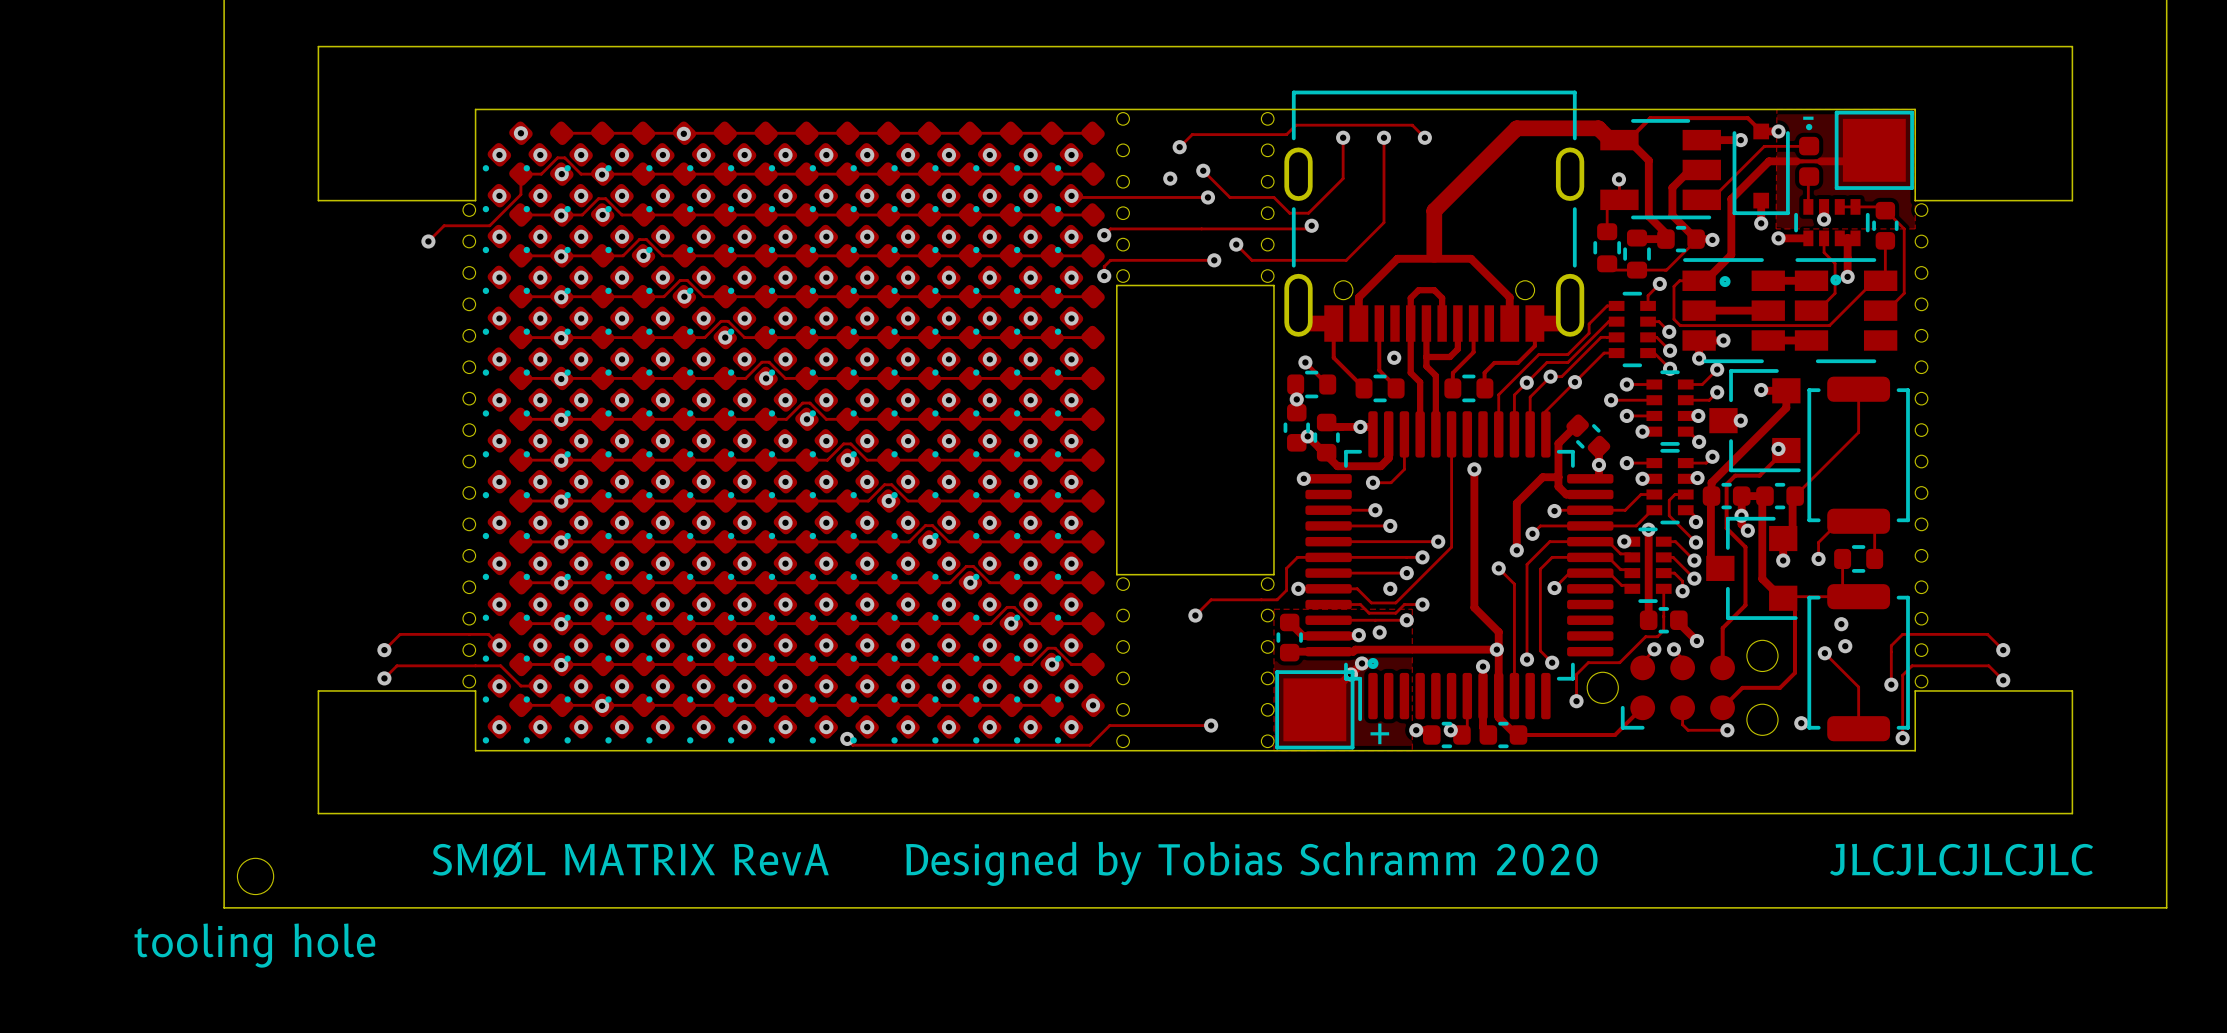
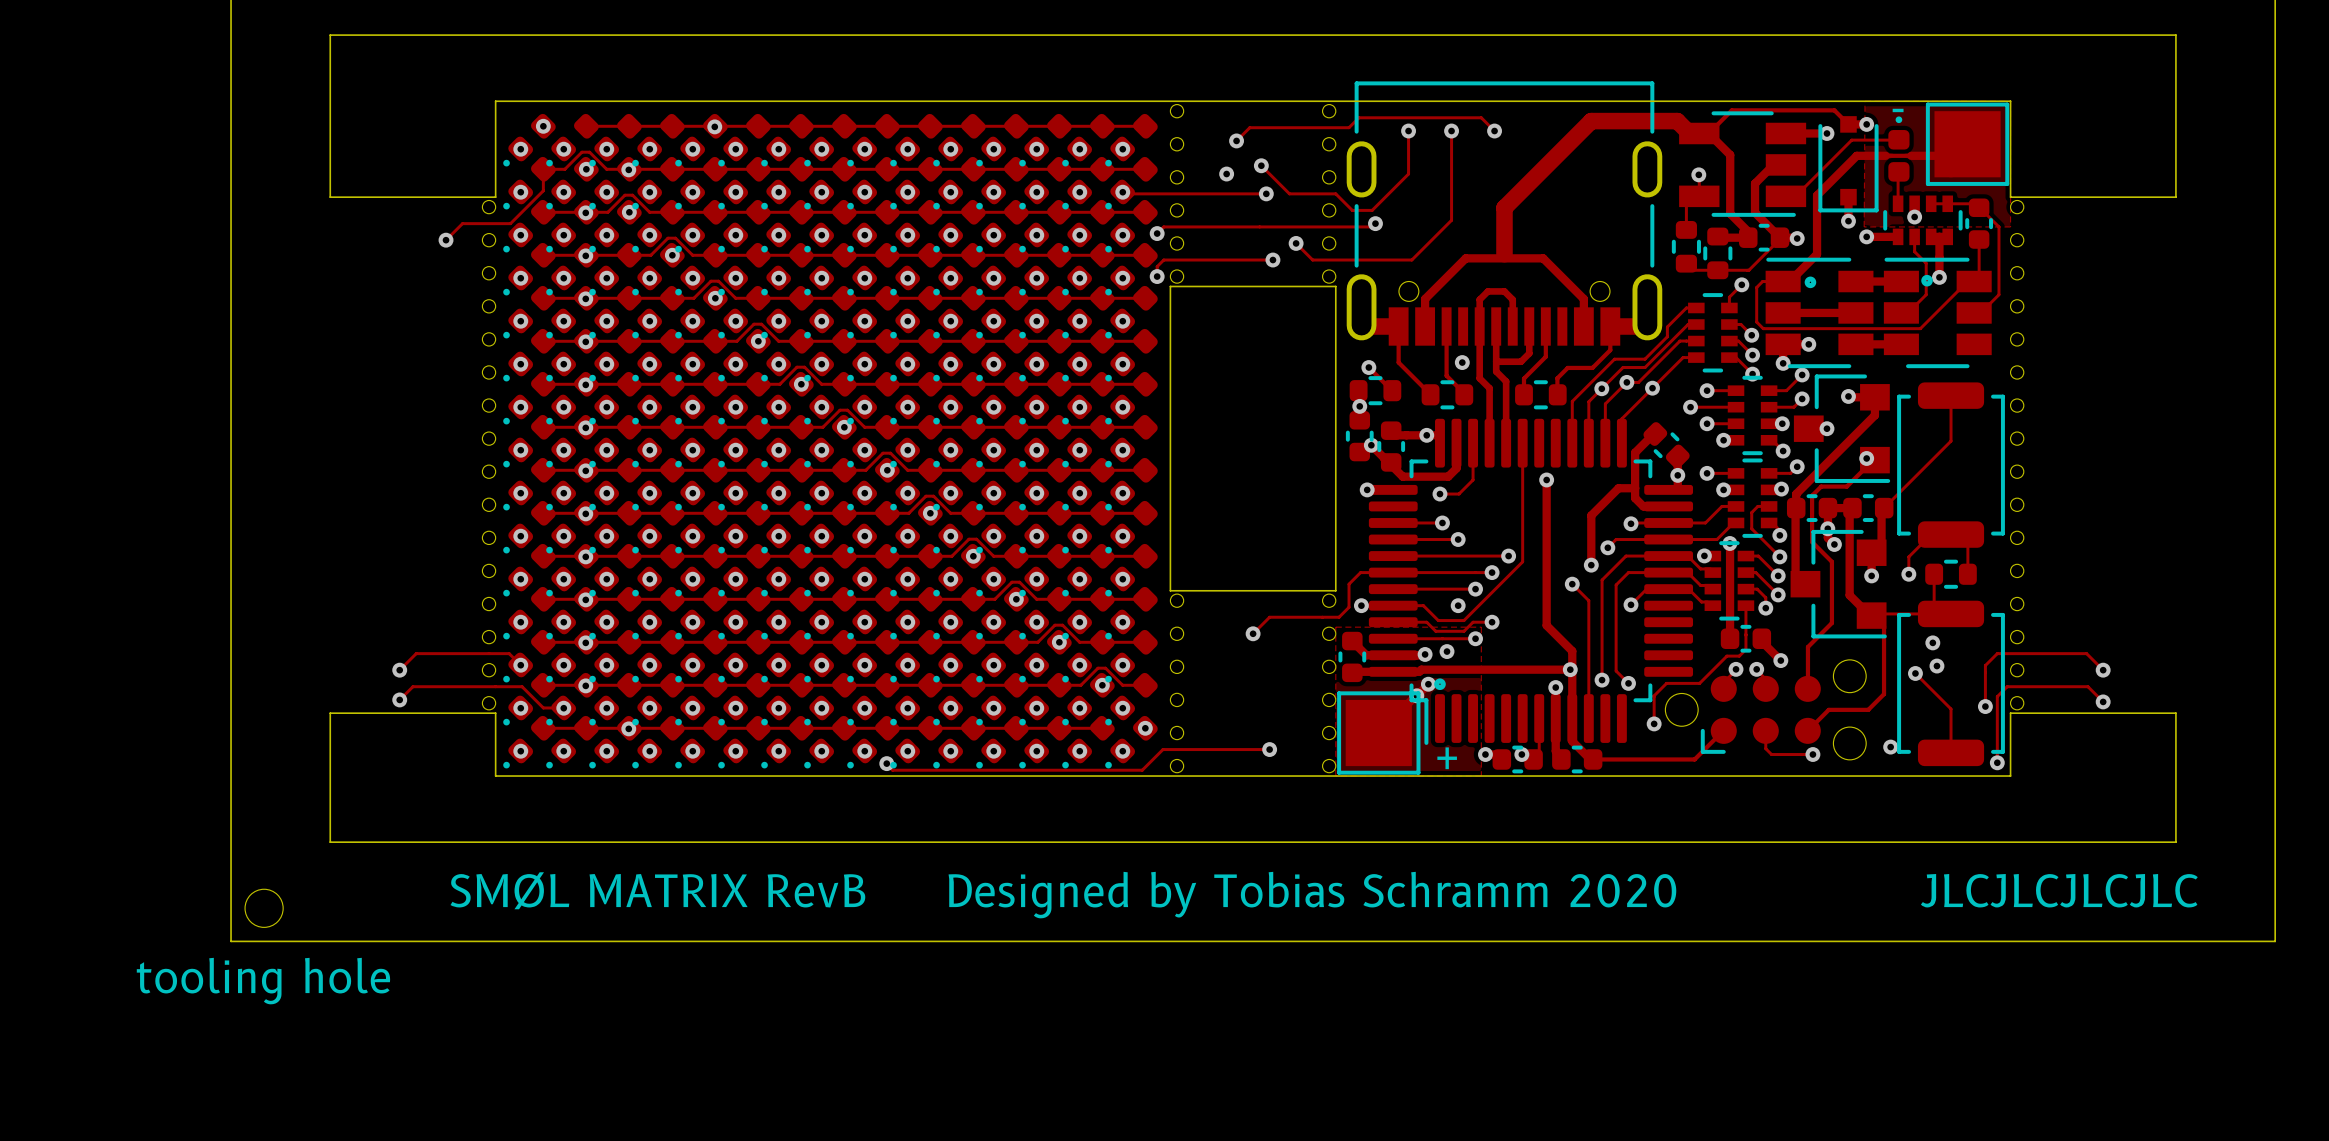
text: SMØL MATRIX RevA Designed by Tobias Schramm 2020 (1015, 863) -> SMØL MATRIX RevB Designed by Tobias Schramm 2020 (1063, 895)

